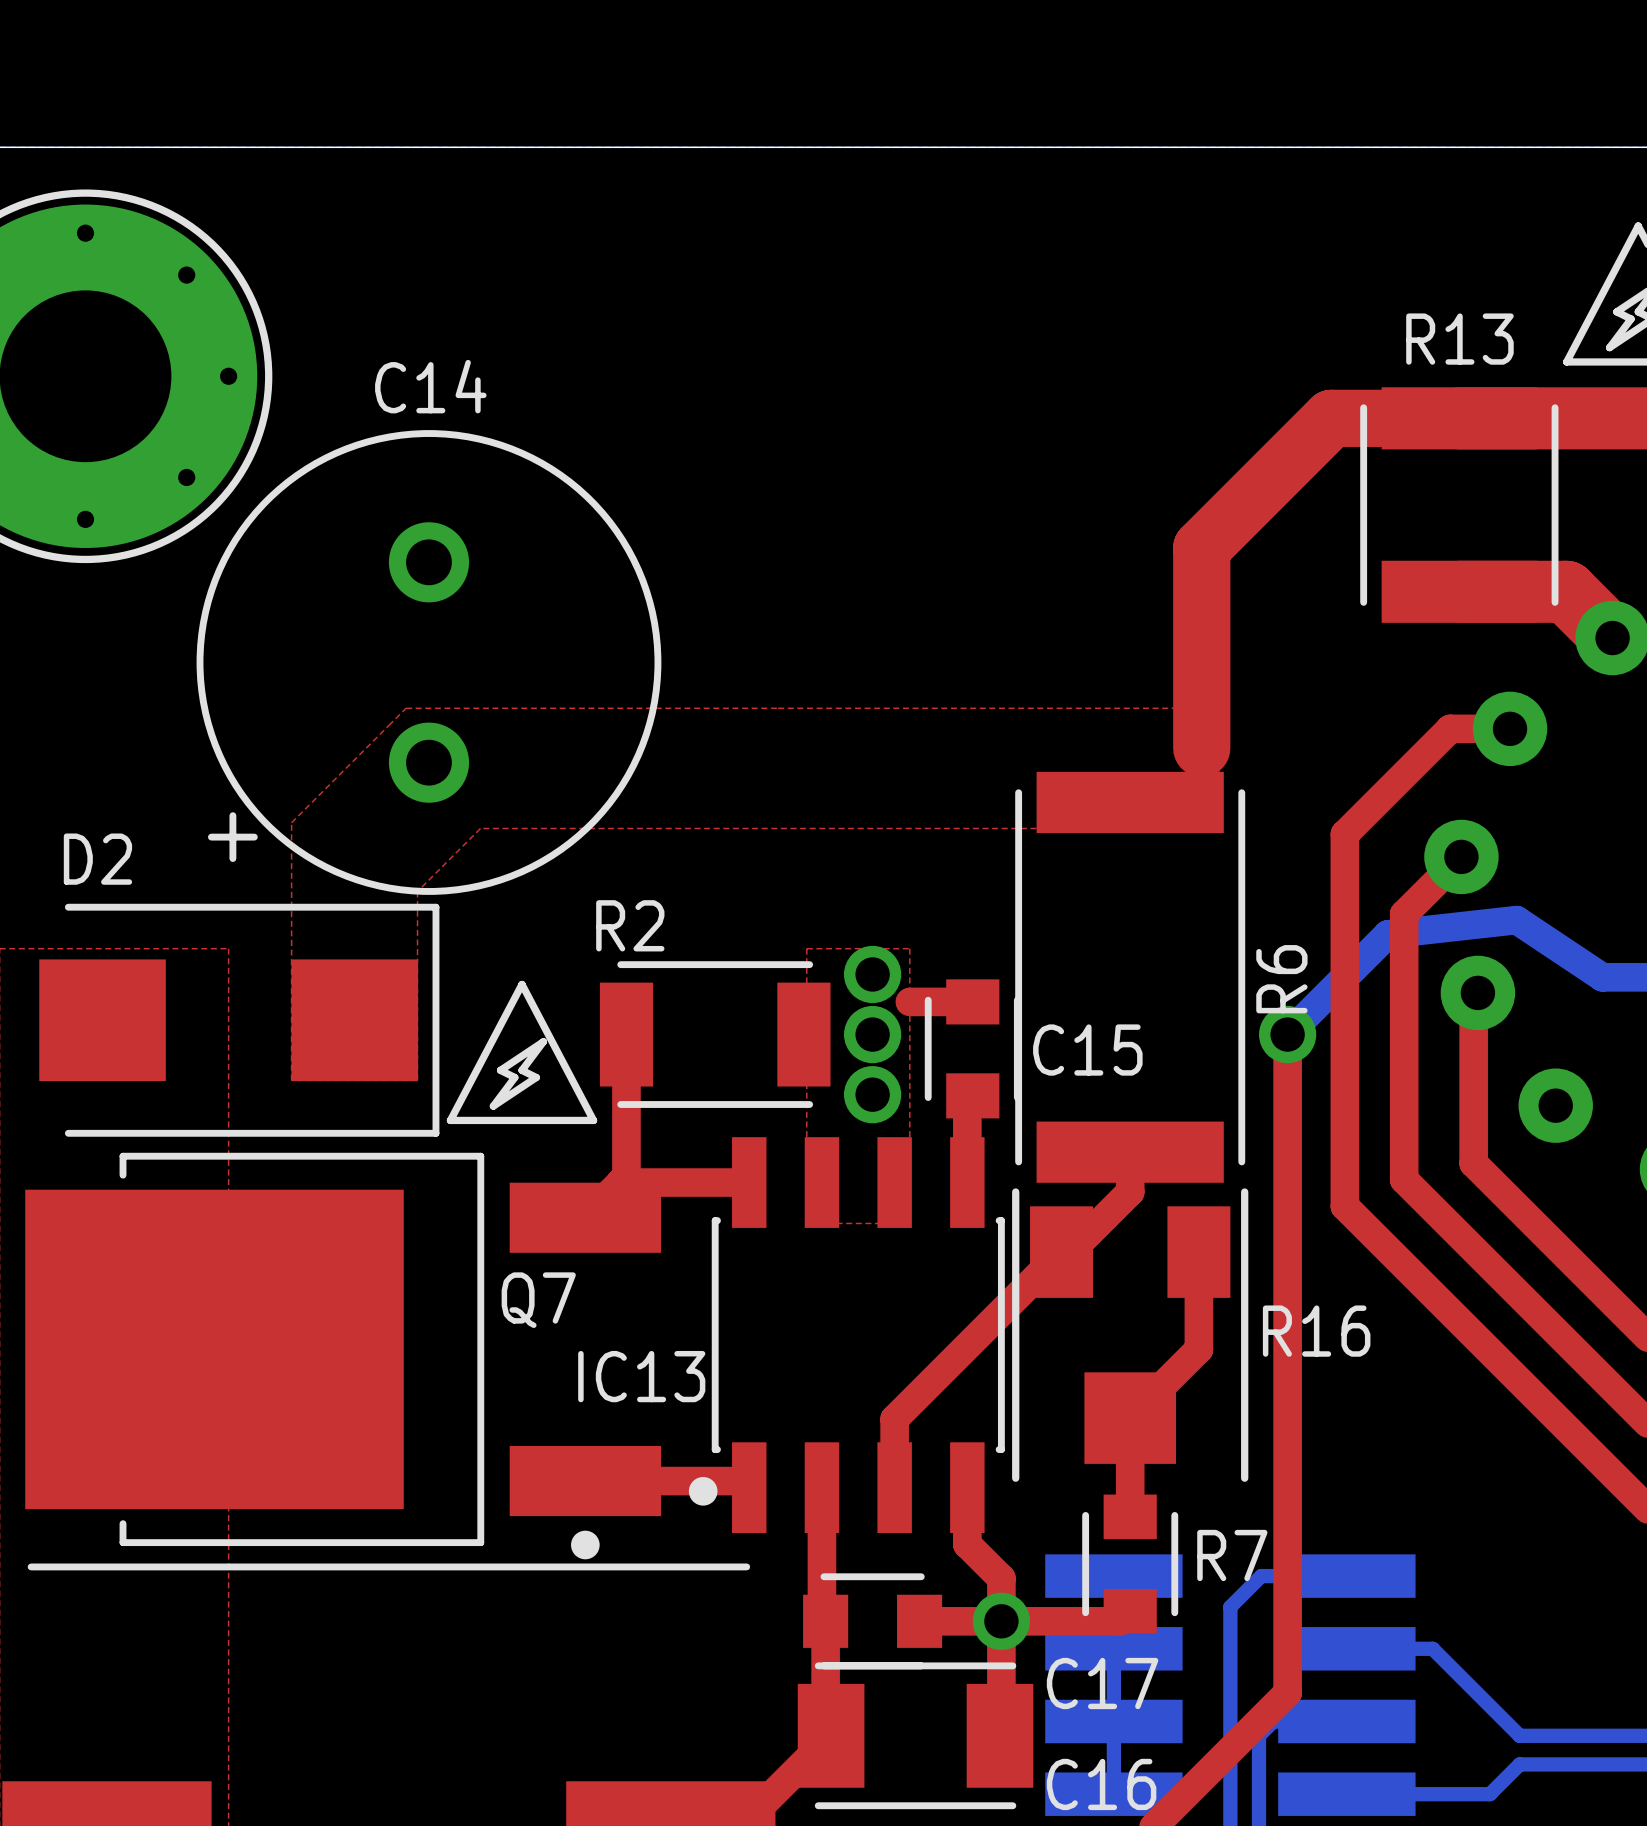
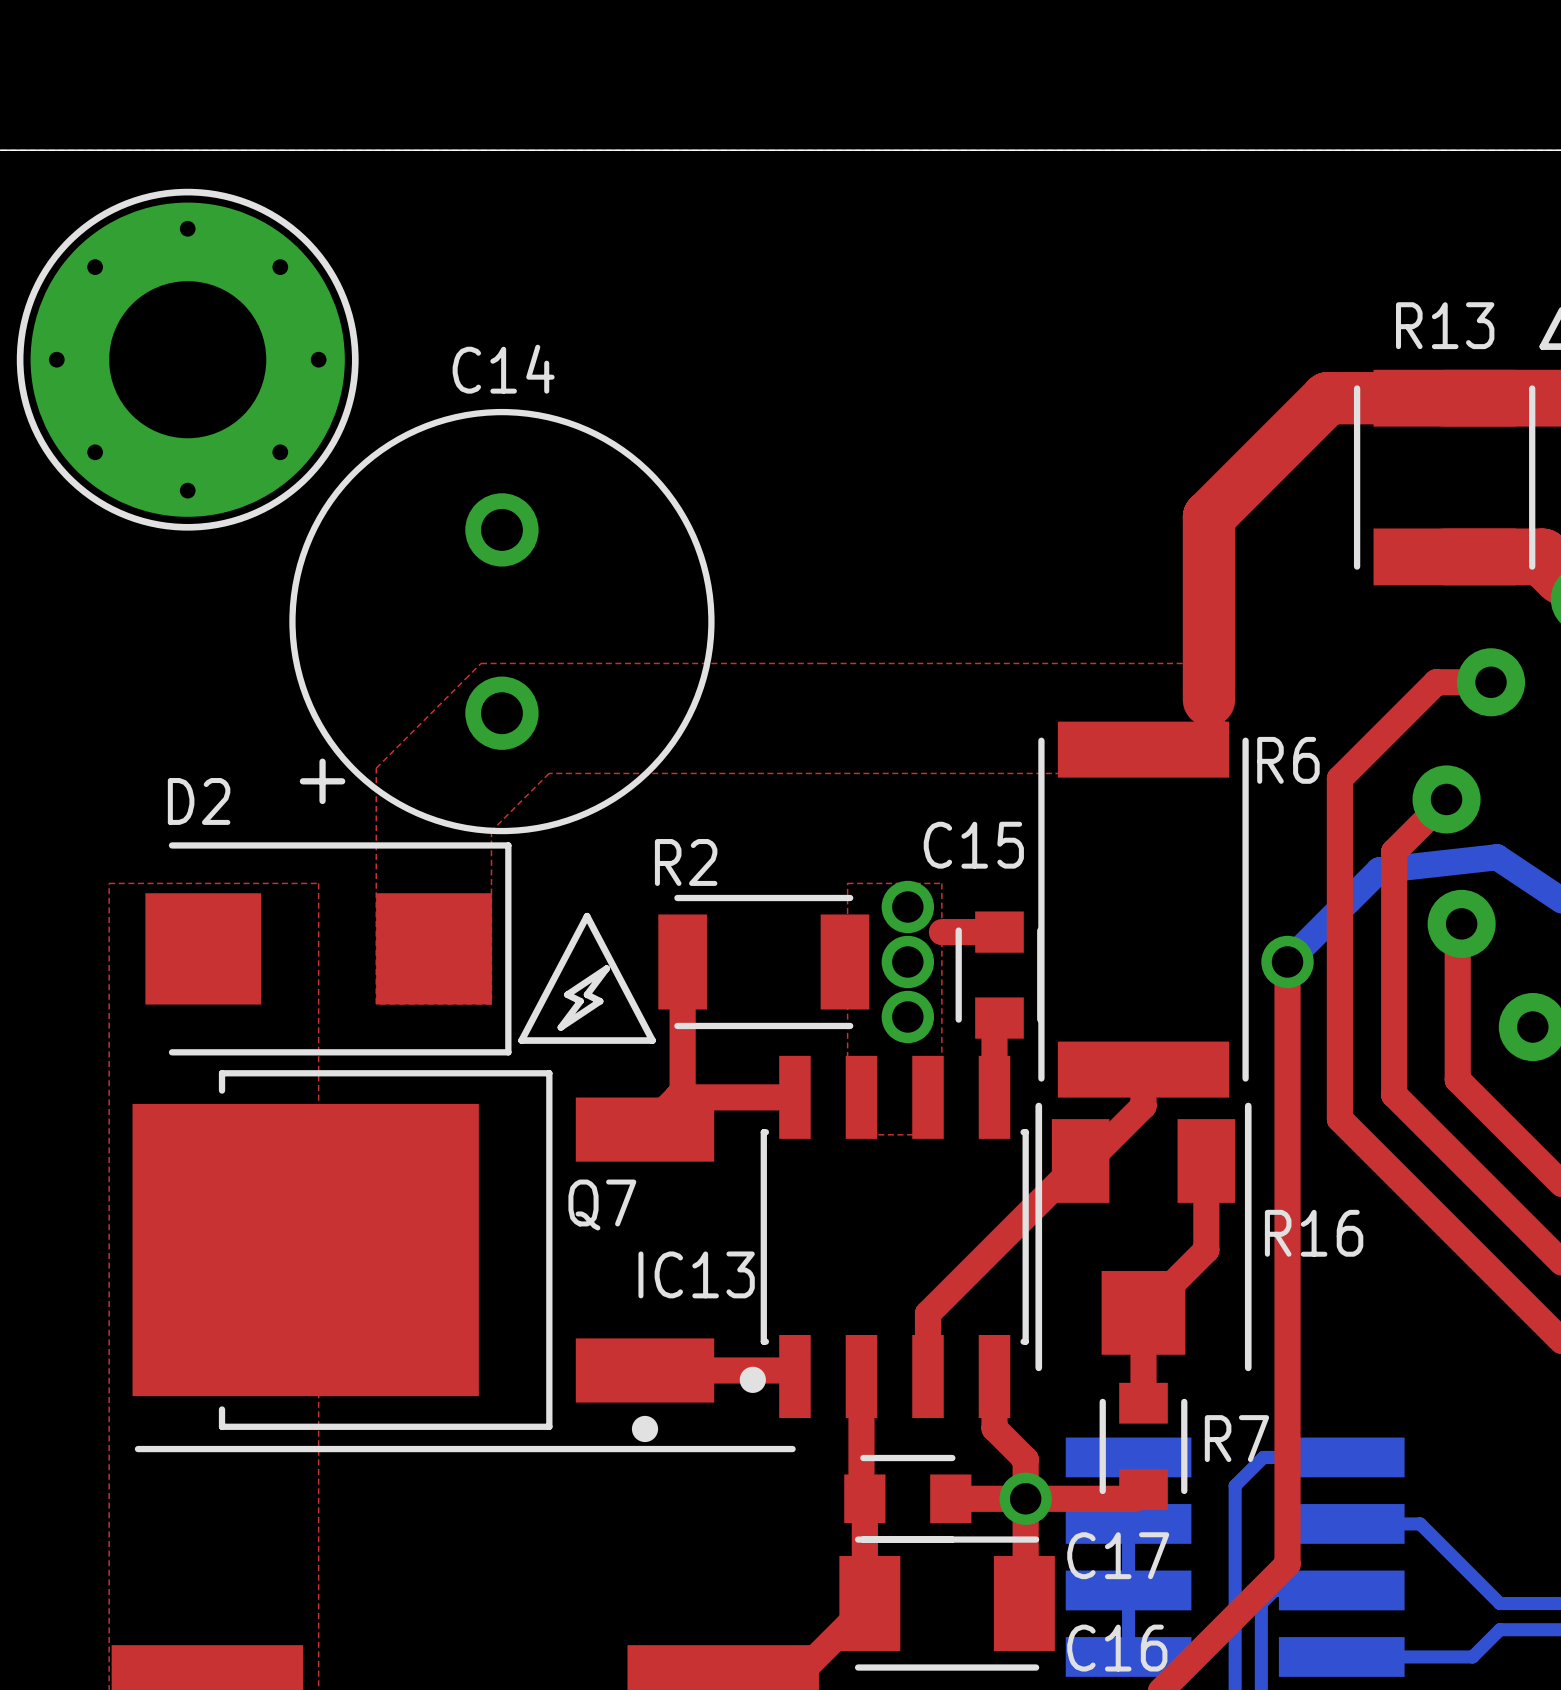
R6 name rotation: 0° (1281, 979) -> 90° clockwise (1288, 760)
R6 name position: R6 (1281, 979) -> R6 (1288, 760)
C15 name position: C15 (1087, 1050) -> C15 (973, 845)

